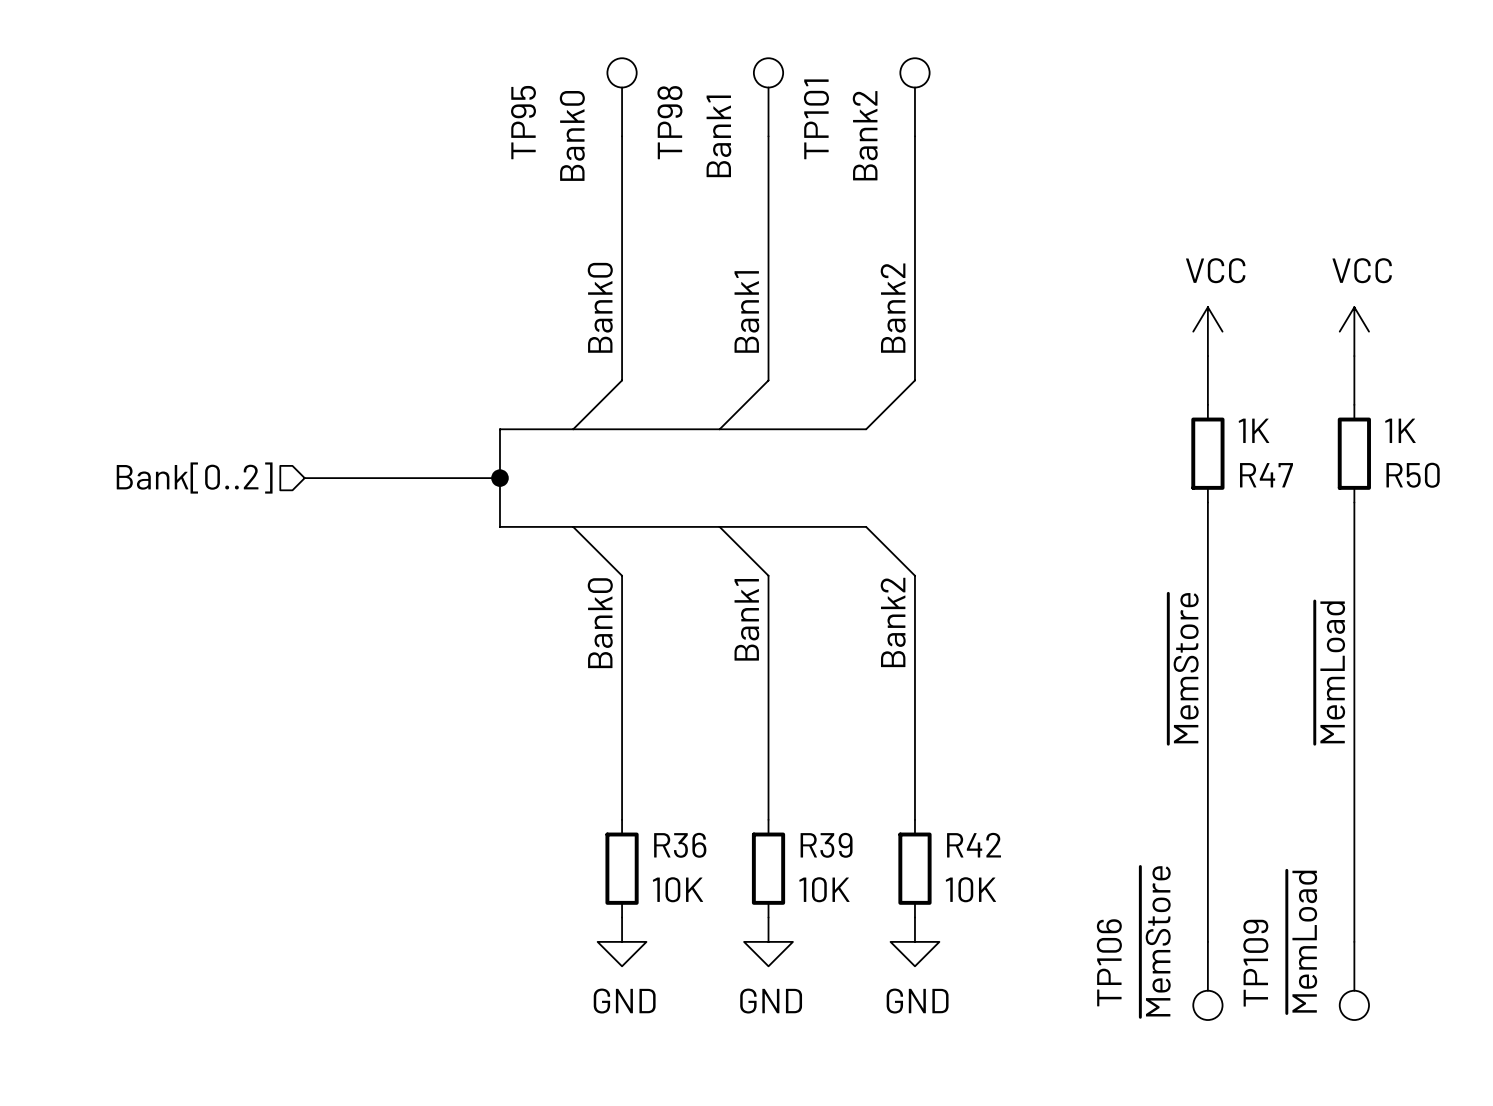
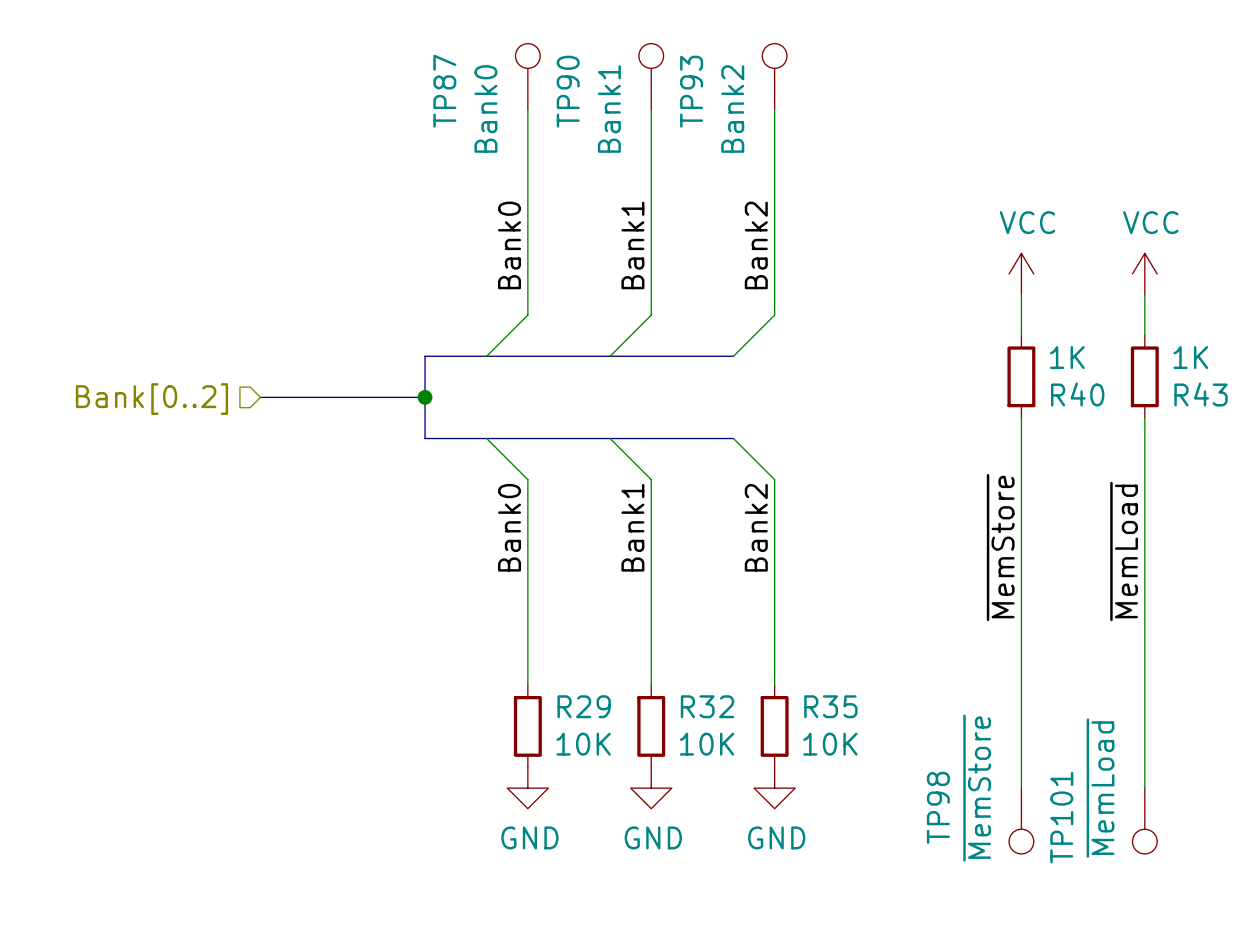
TP101 name: TP101 (816, 119) -> TP93 (691, 91)
TP95 name: TP95 (523, 122) -> TP87 (444, 91)
TP98 name: TP98 (669, 122) -> TP90 (568, 91)
R47 name: R47 (1266, 475) -> R40 (1077, 394)
R50 name: R50 (1413, 475) -> R43 (1201, 394)
R36 name: R36 (680, 845) -> R29 (584, 706)
R39 name: R39 (826, 845) -> R32 (707, 706)
R42 name: R42 (974, 845) -> R35 (830, 706)
TP106 name: TP106 (1109, 962) -> TP98 (938, 807)
TP109 name: TP109 (1255, 963) -> TP101 (1061, 817)

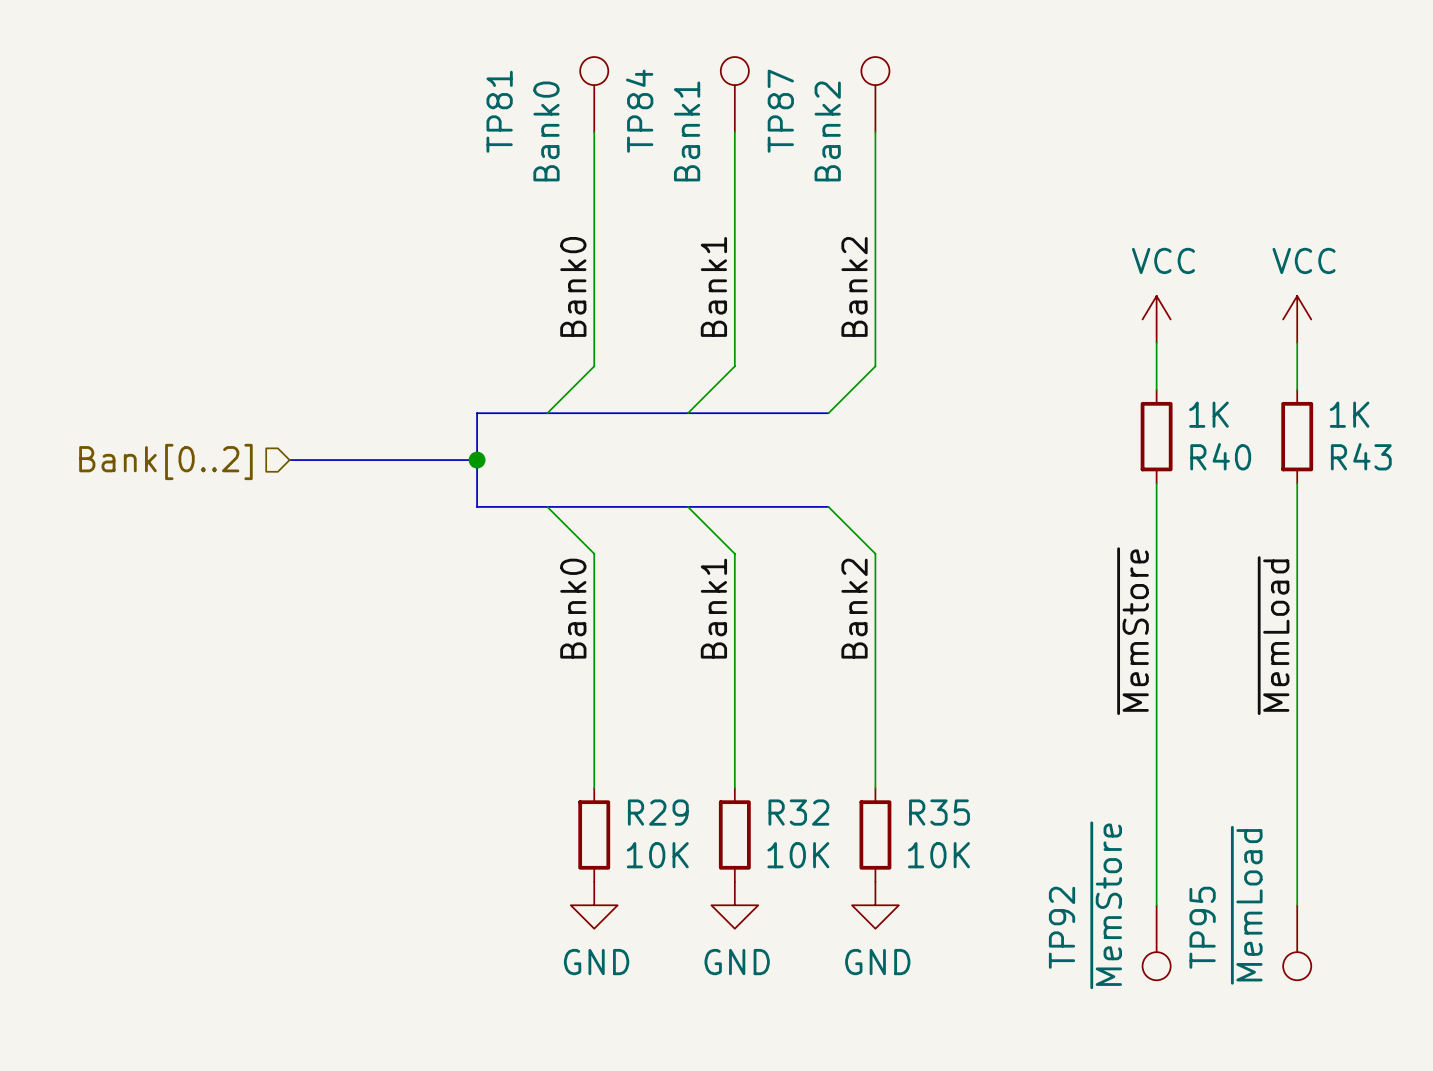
TP87 name: TP87 (444, 91) -> TP81 (499, 111)
TP90 name: TP90 (568, 91) -> TP84 (639, 111)
TP93 name: TP93 (691, 91) -> TP87 (780, 111)
TP98 name: TP98 (938, 807) -> TP92 (1062, 927)
TP101 name: TP101 (1061, 817) -> TP95 (1202, 927)

